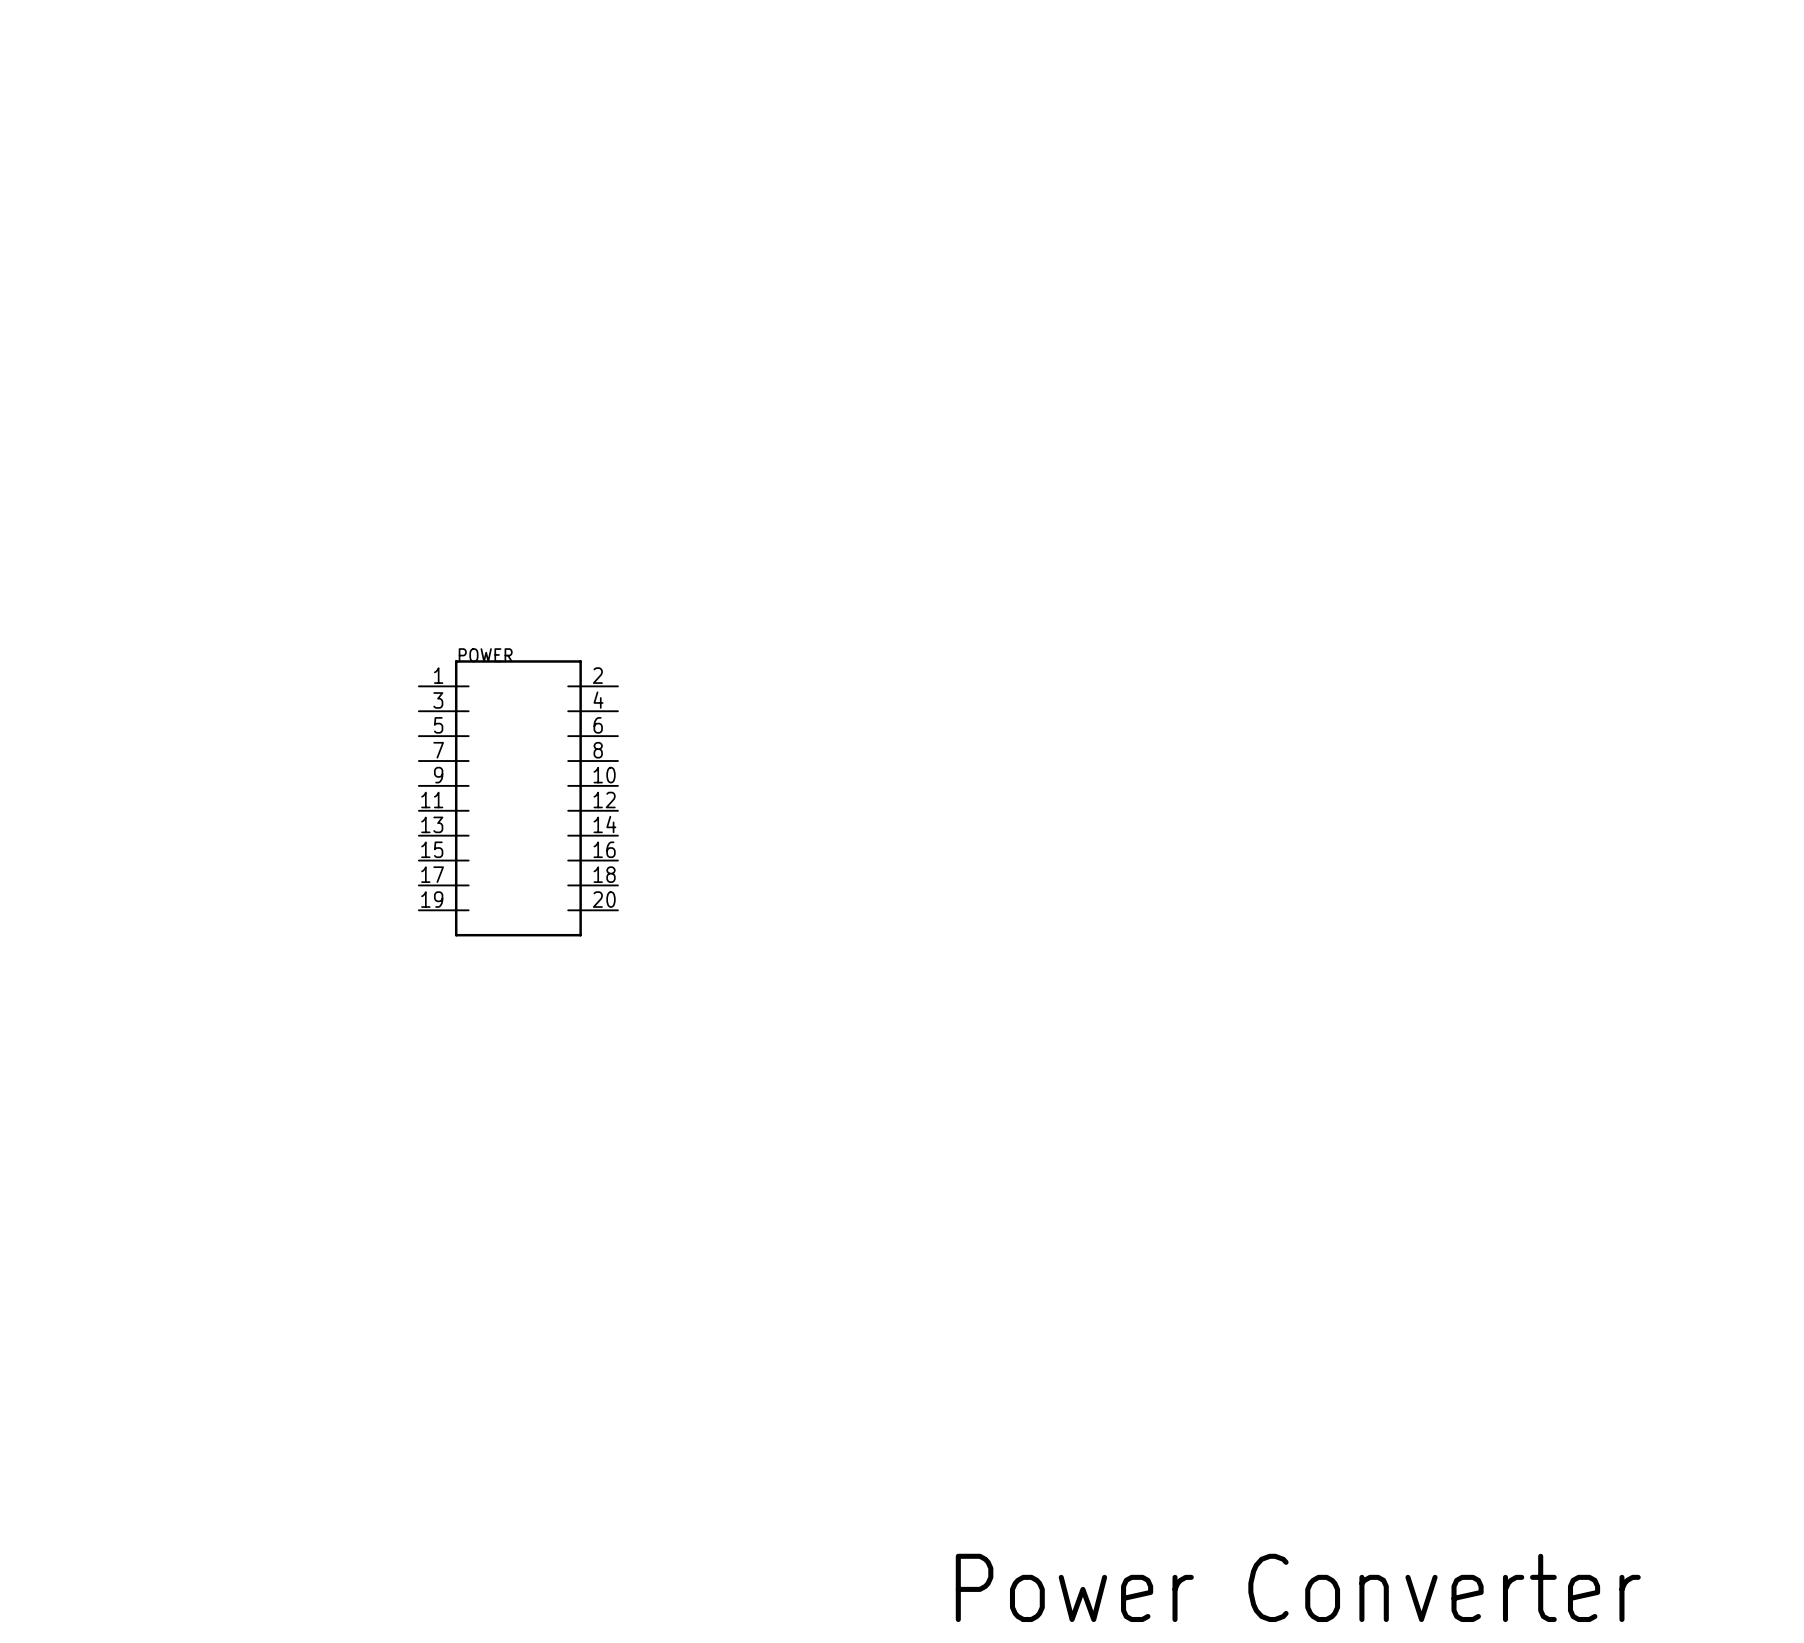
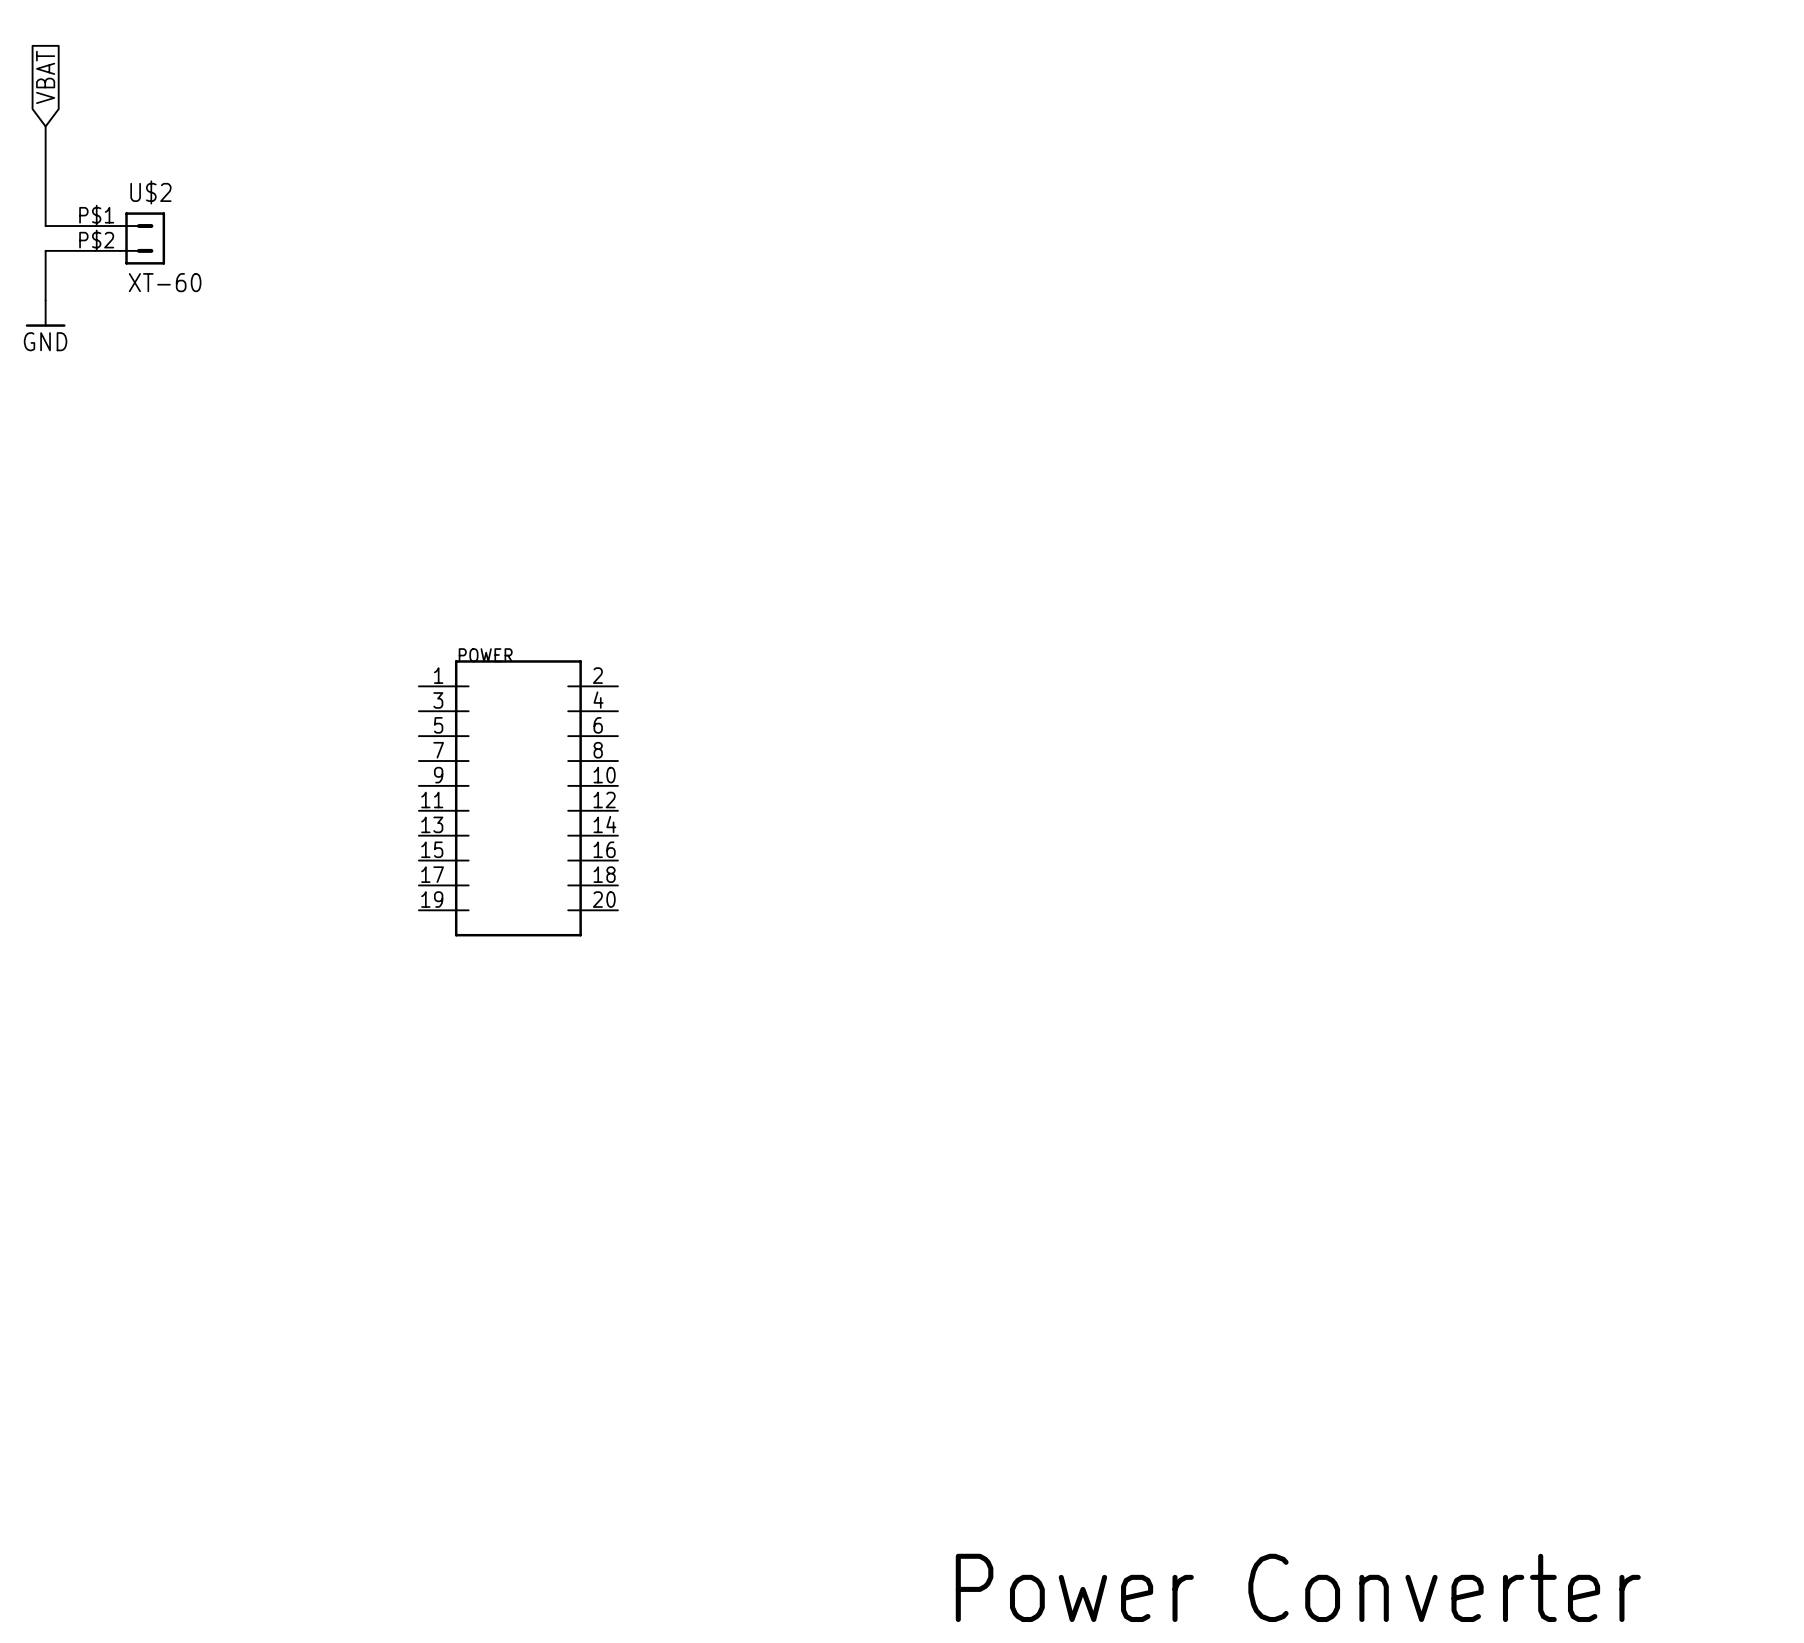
global label: none -> VBAT (45, 77)
wire: none -> (45, 126) (45, 226) (95, 226)
U$2: none -> XT-60 (130, 238)
wire: none -> (95, 250) (45, 250) (45, 300)
power symbol: none -> GND (45, 313)

